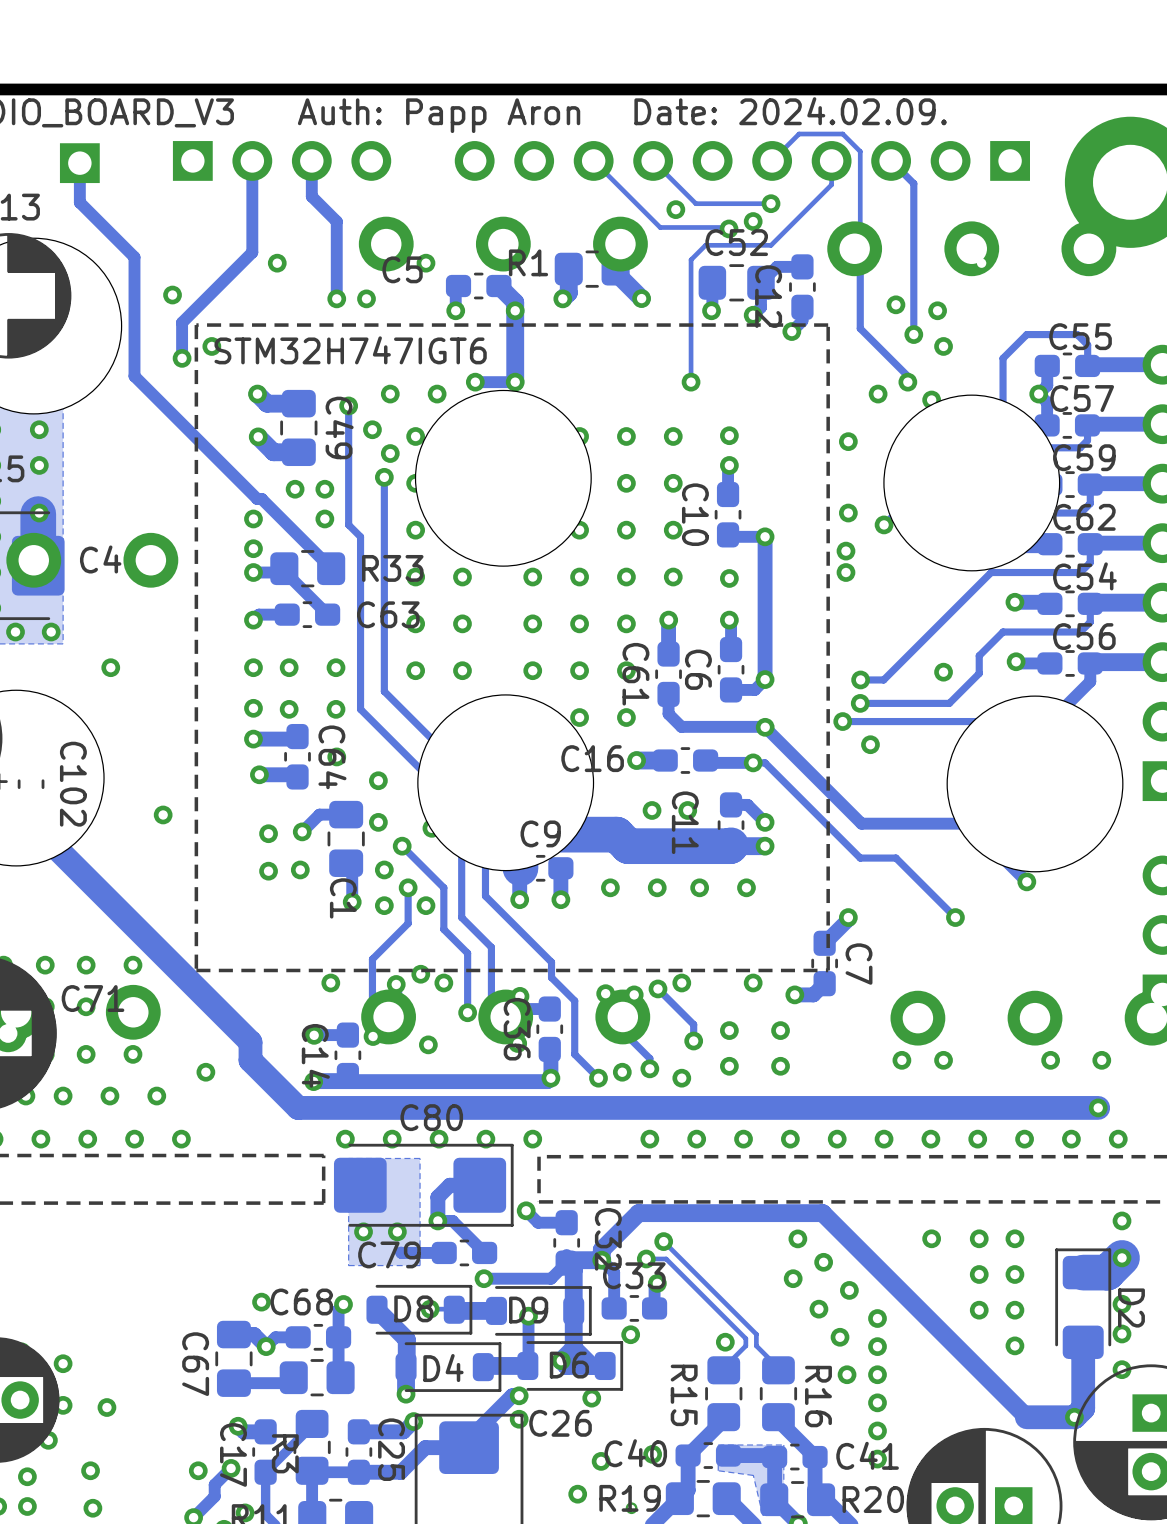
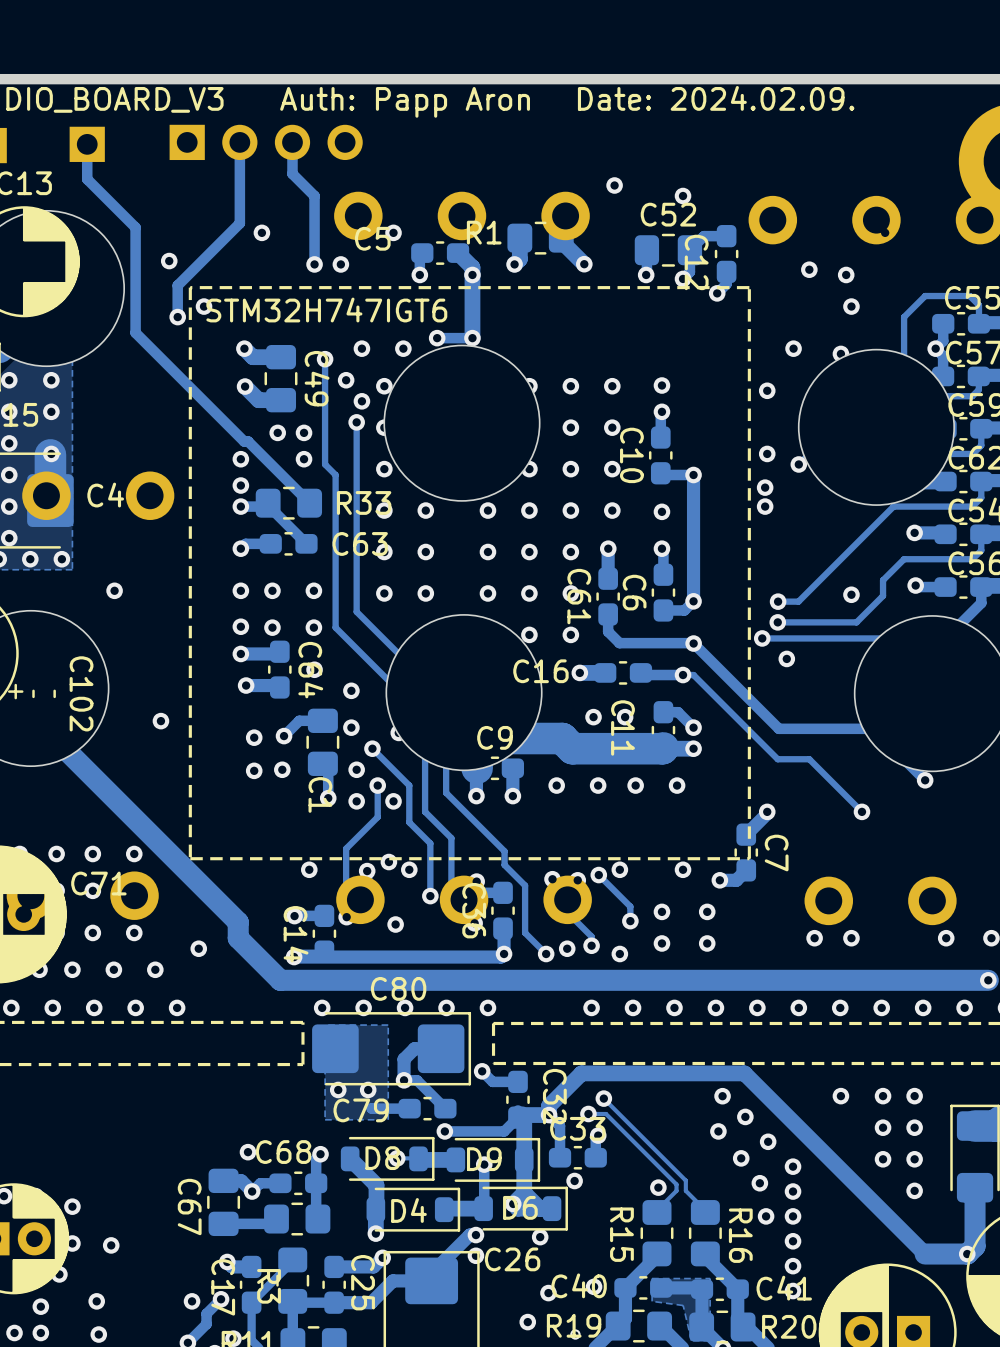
track: (593, 160) (660, 227) (729, 228) -> none
track: (653, 160) (695, 203) (771, 203) -> none
part: (742, 160) -> none
track: (772, 160) (799, 134) (842, 134) (860, 151) (860, 328) (907, 376) (907, 382) -> none
track: (831, 160) (831, 184) (771, 245) (705, 245) (691, 259) (691, 382) -> none
track: (891, 160) (913, 183) (913, 334) -> none
via: (771, 203) -> none
via: (729, 228) -> none
via: (913, 334) -> none
via: (691, 382) -> none
via: (907, 382) -> none

